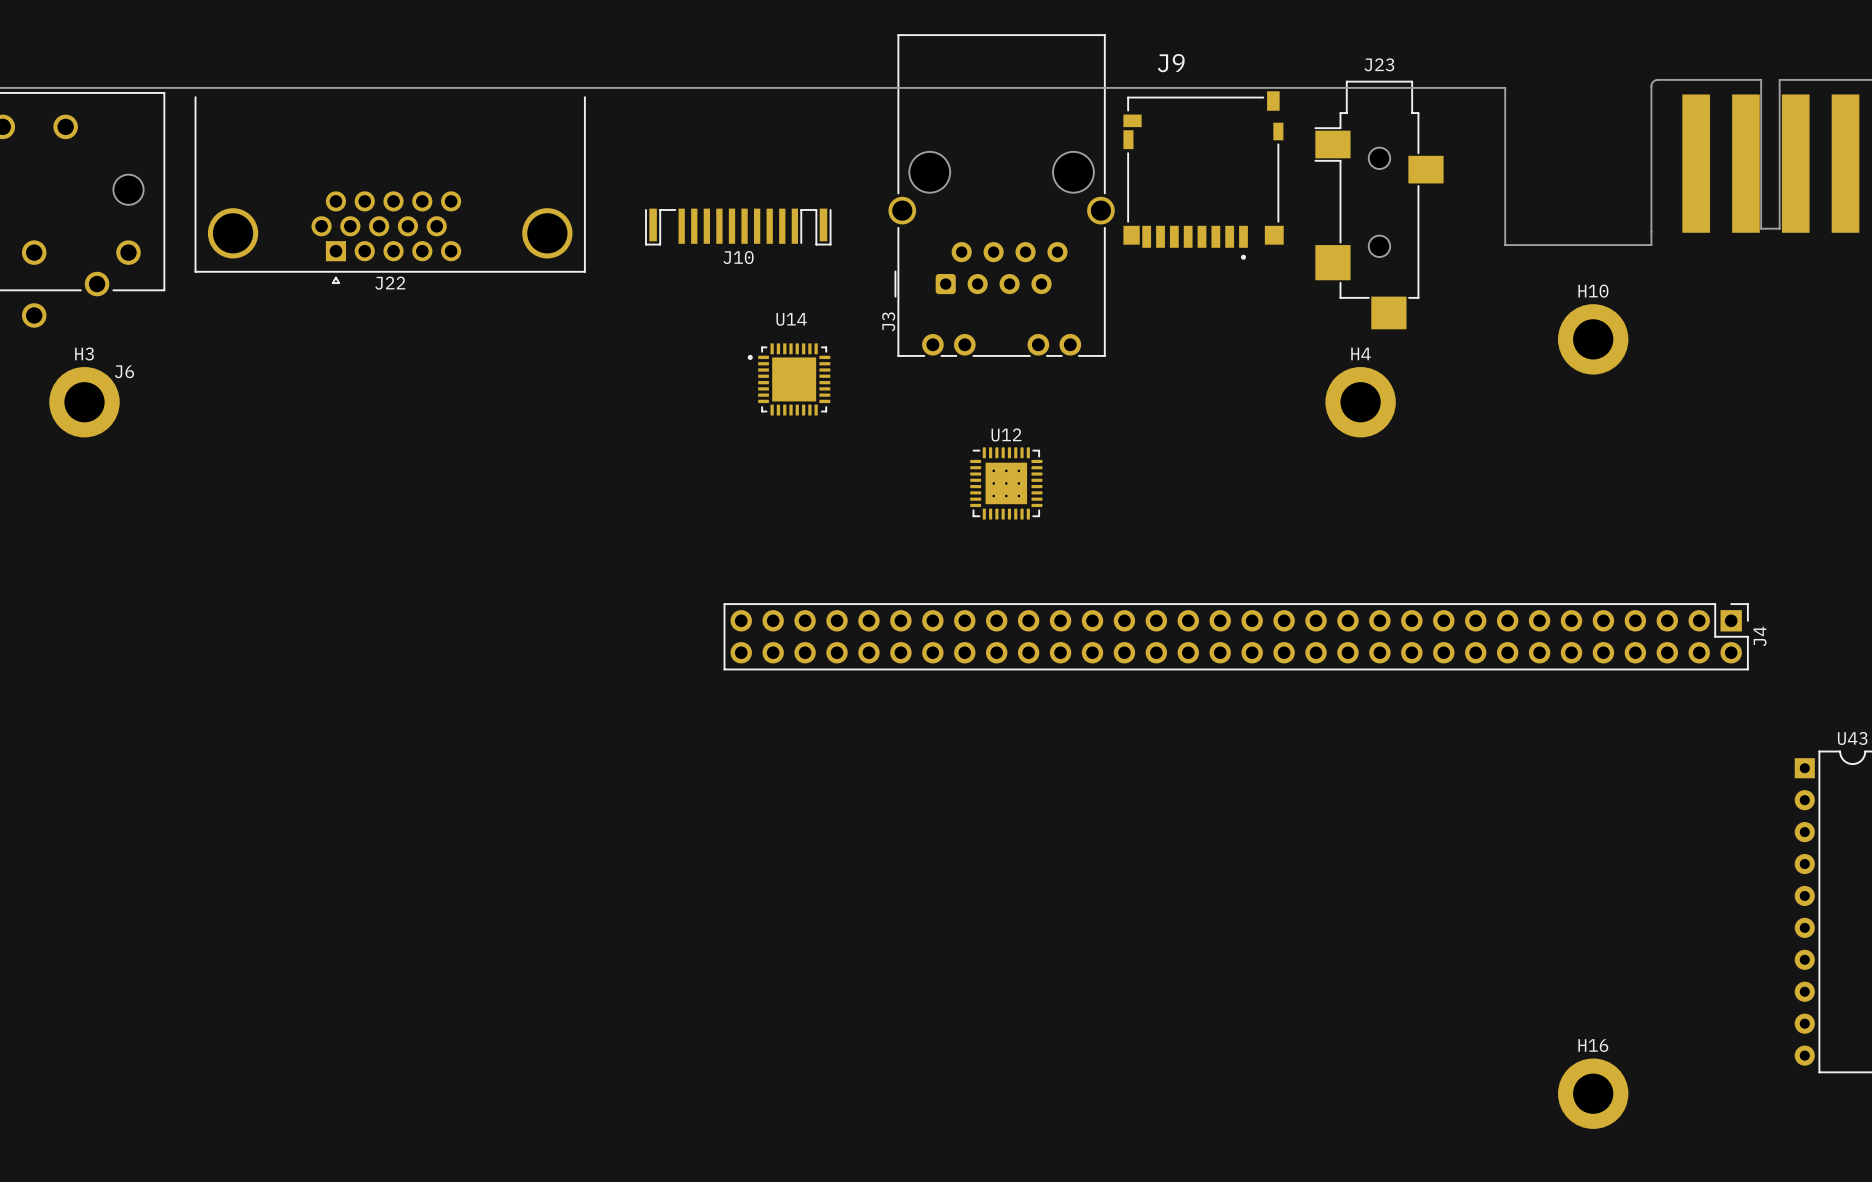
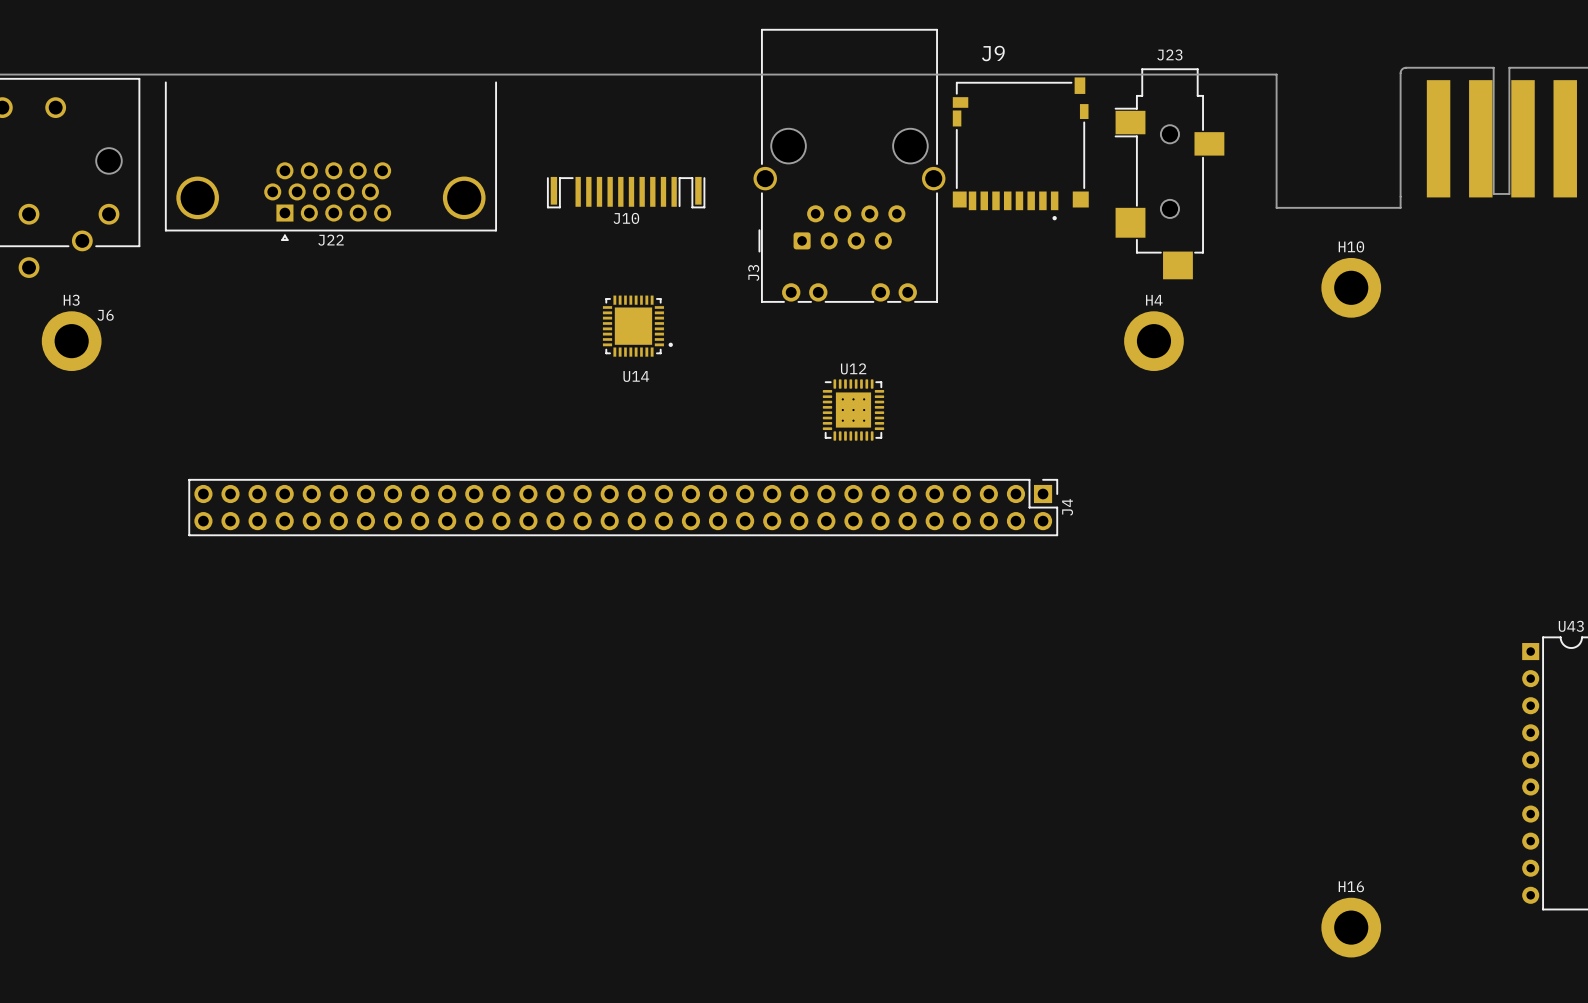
U14 rotation: 0° (788, 379) -> 180° (637, 326)
J4 position: (1236, 636) -> (623, 507)

